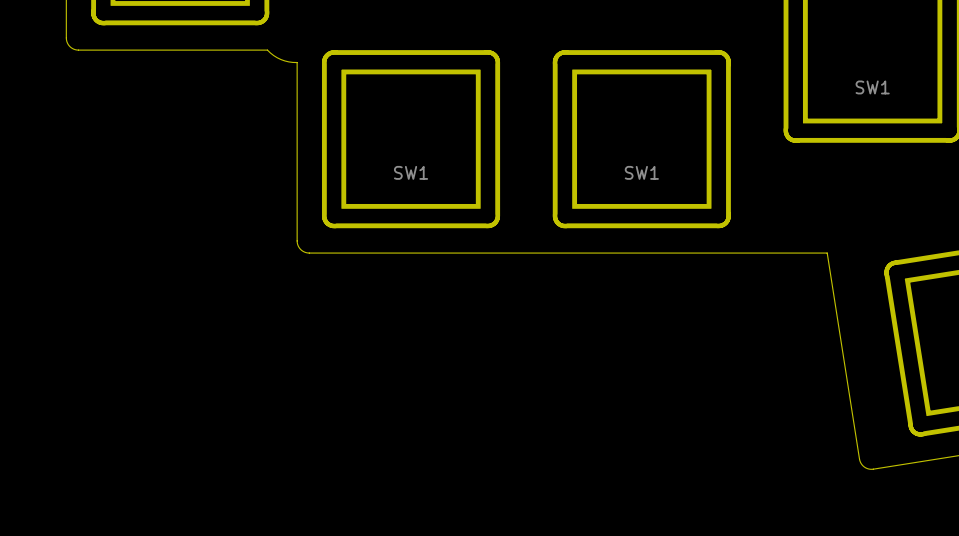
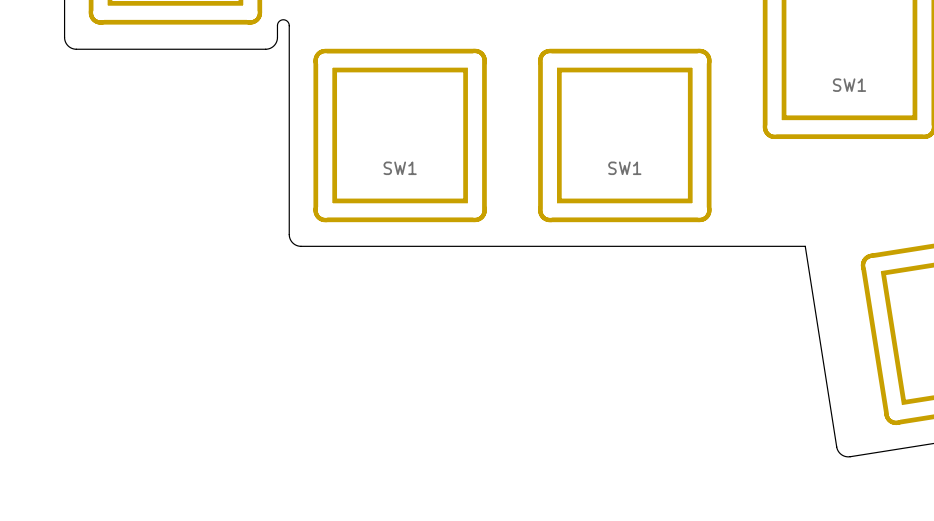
board edge: (66, 37) (69, 46) (76, 50) (267, 50) (280, 59) (297, 62) -> (64, 36) (68, 45) (76, 49) (267, 49) (275, 43) (277, 23) (284, 19) (289, 24) (289, 60)

